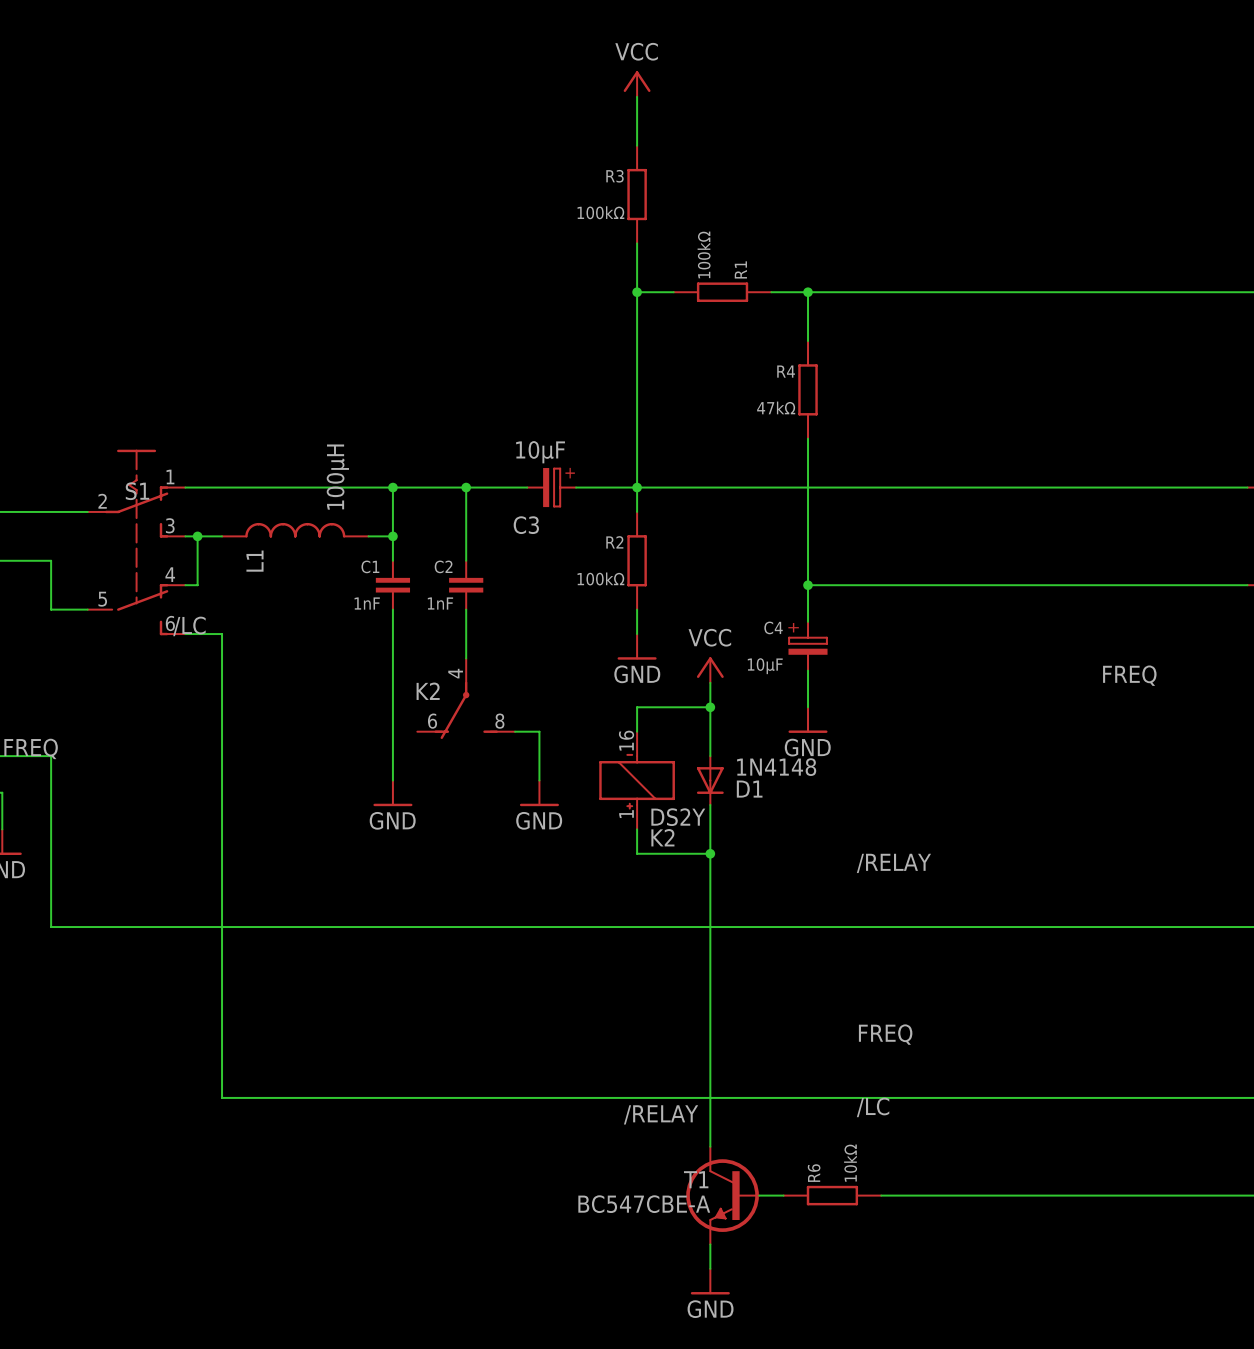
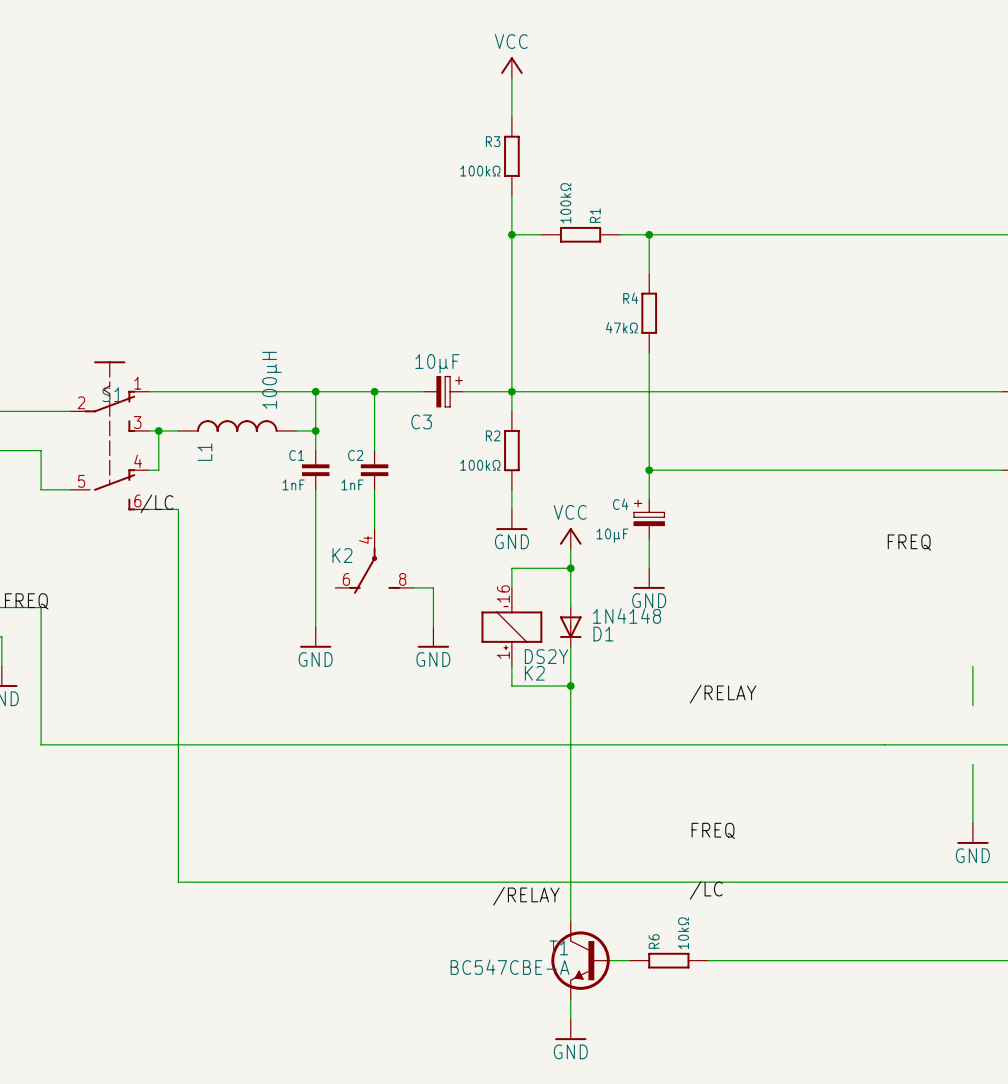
wire: none -> (972, 666) (972, 705)
wire: none -> (972, 764) (972, 823)
power symbol: none -> GND (972, 833)

